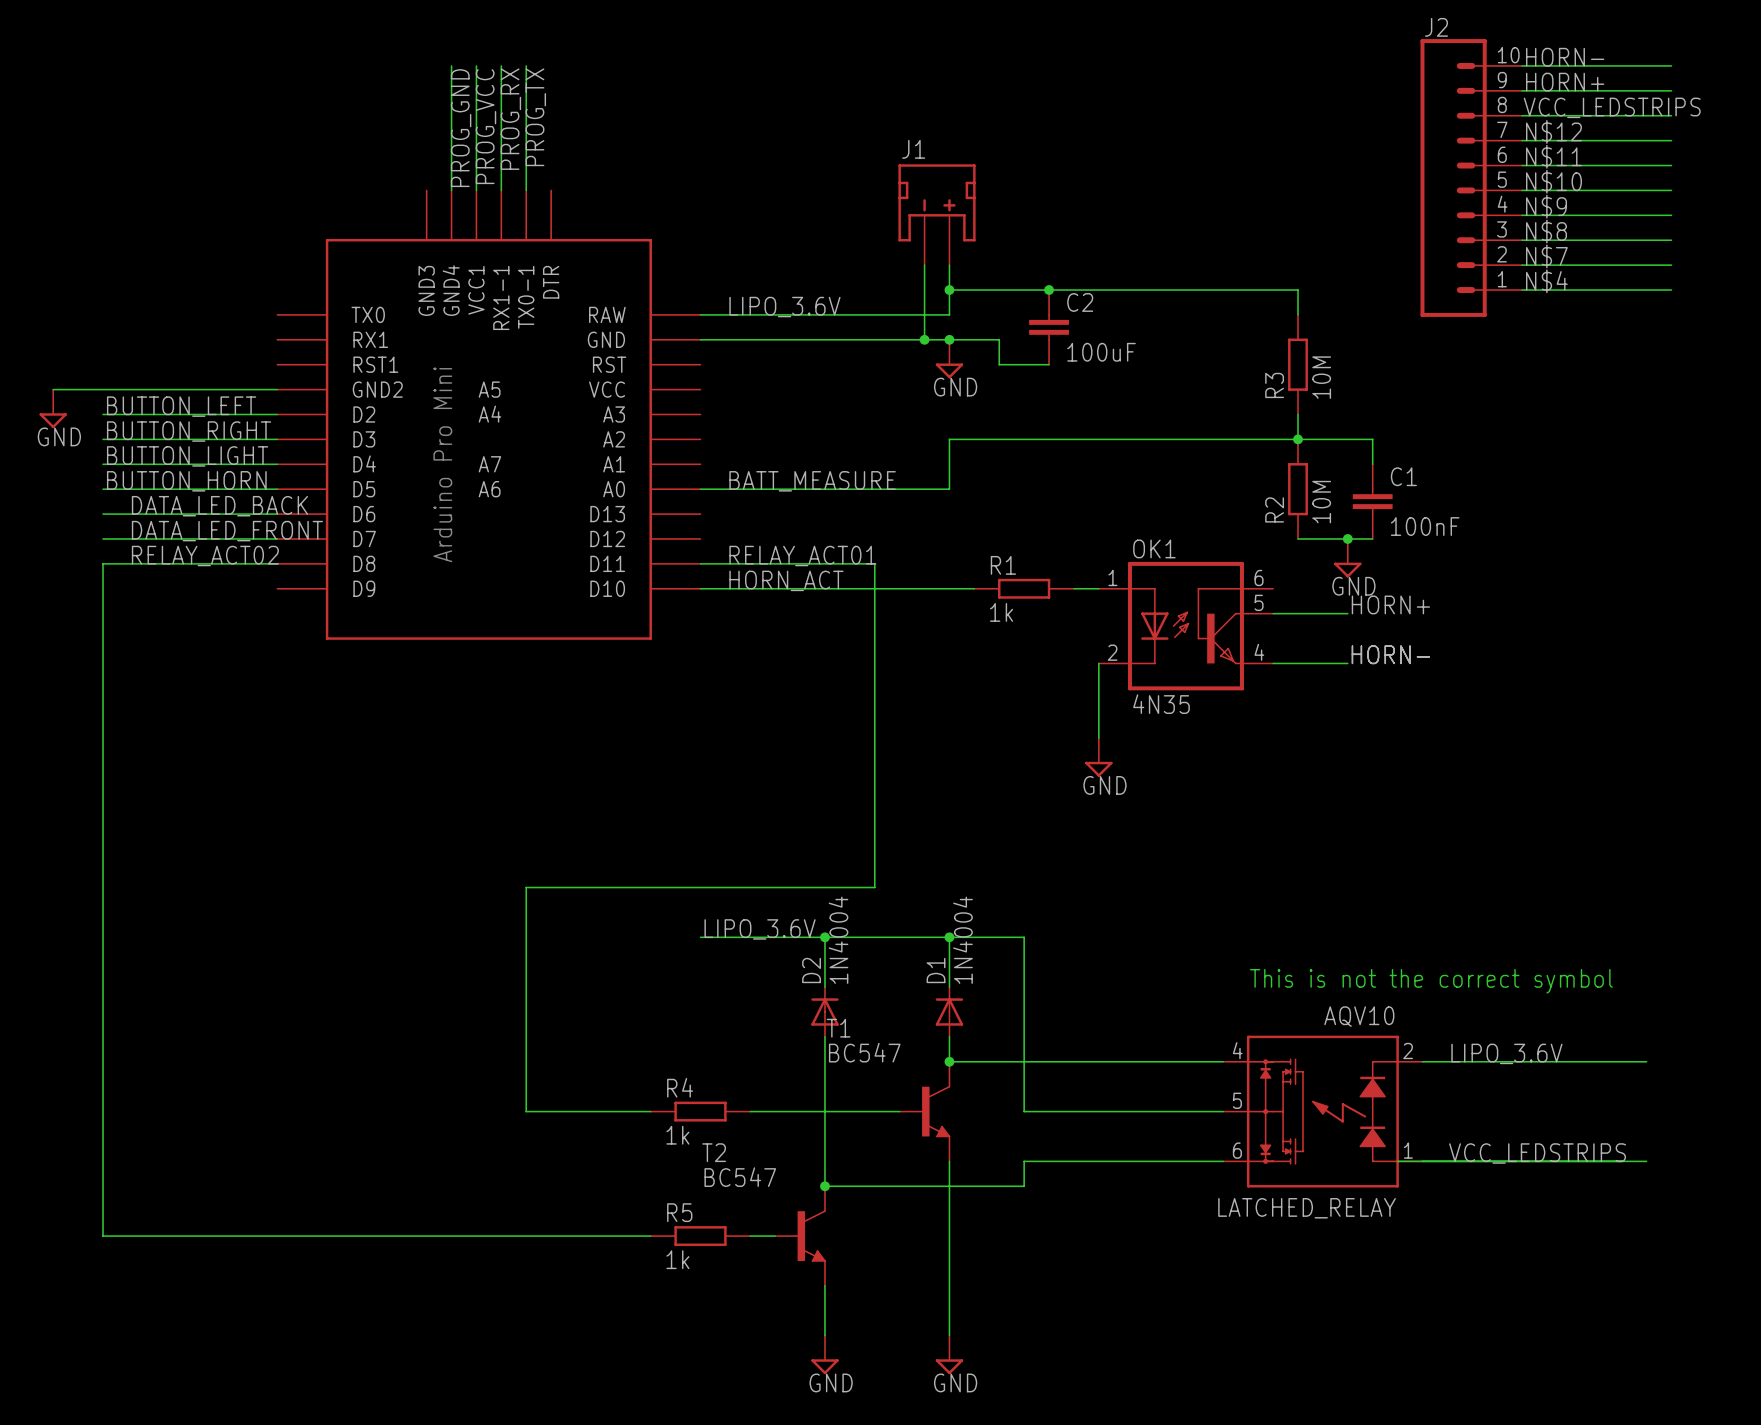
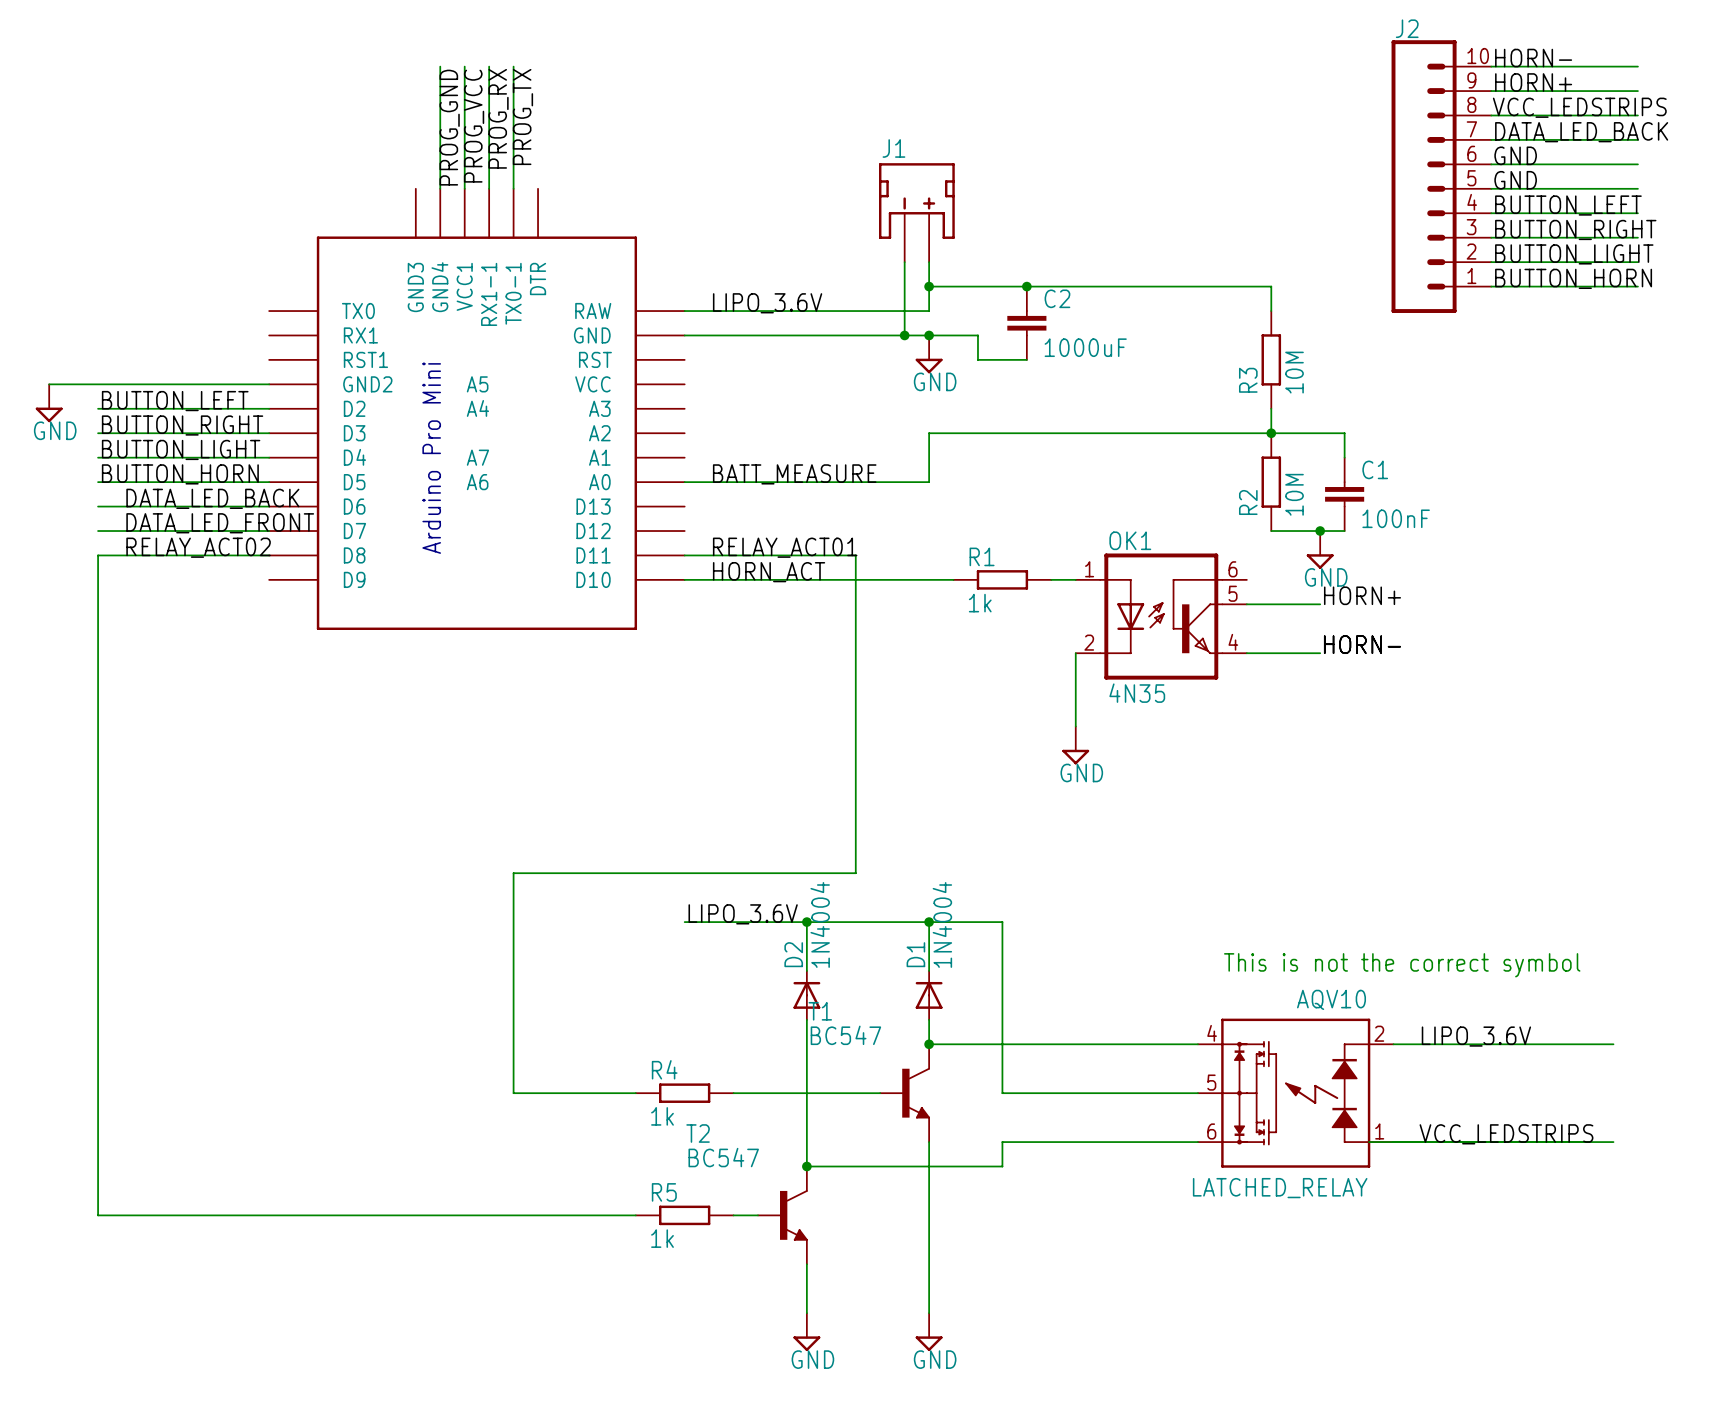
label: N$12 (1553, 131) -> DATA_LED_BACK (1581, 132)
label: N$11 (1553, 156) -> GND (1515, 155)
label: N$10 (1553, 181) -> GND (1515, 180)
label: N$9 (1546, 206) -> BUTTON_LEFT (1568, 205)
label: N$8 (1546, 231) -> BUTTON_RIGHT (1575, 229)
label: N$7 (1546, 256) -> BUTTON_LIGHT (1574, 254)
label: N$4 (1546, 281) -> BUTTON_HORN (1573, 278)
C2 value: 100uF (1101, 352) -> 1000uF (1085, 347)

